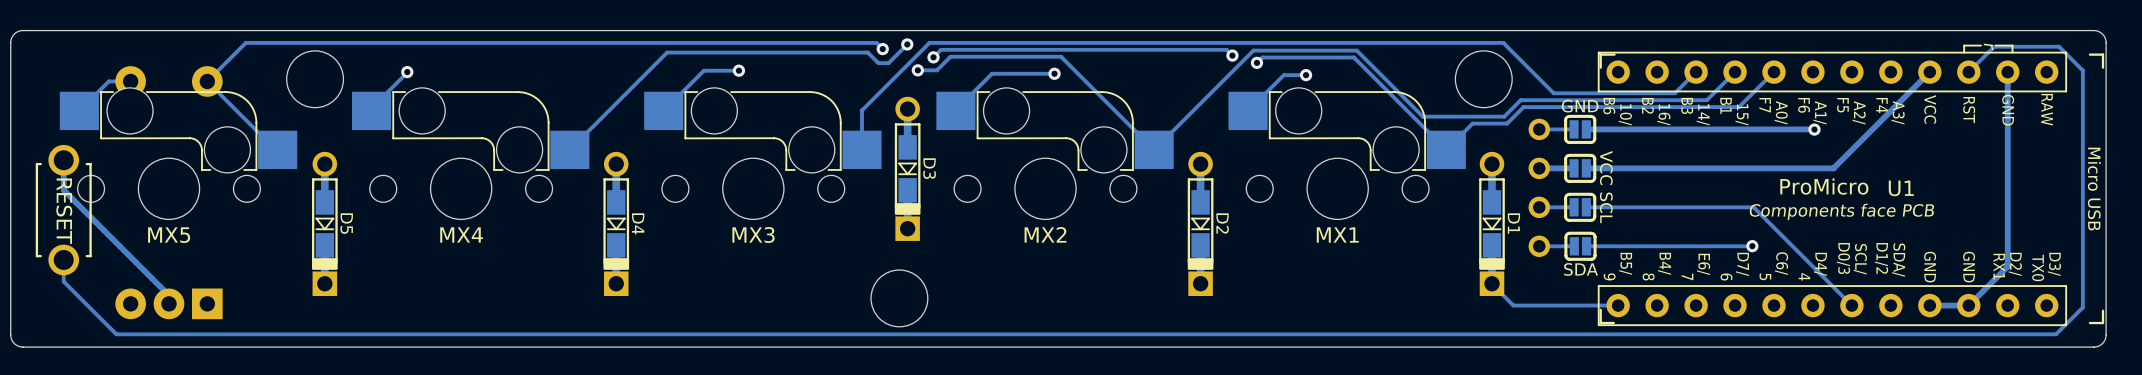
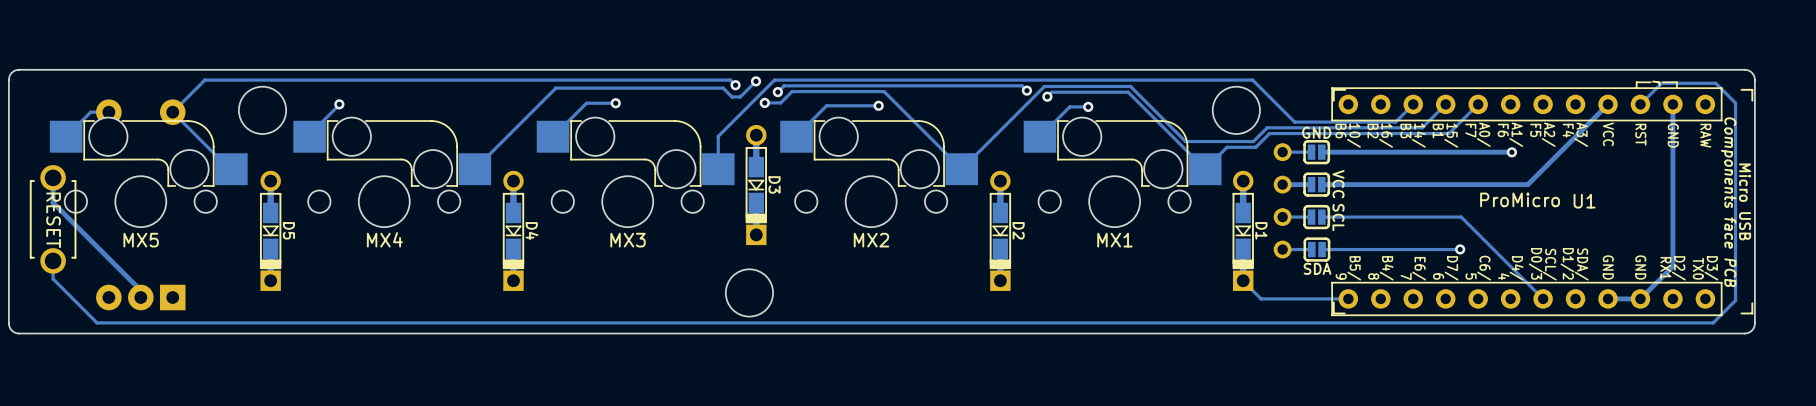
U1 text rotation: 0° (1841, 211) -> 90° clockwise (1728, 202)
U1 text position: Components face PCB (1841, 211) -> Components face PCB (1728, 202)

